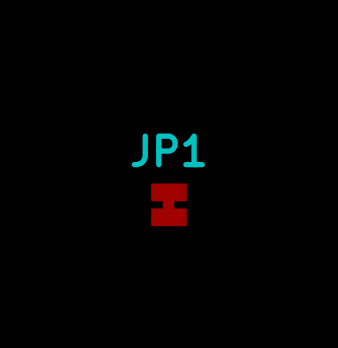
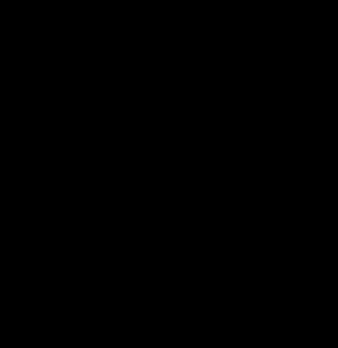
JP1: (168, 204) -> none

